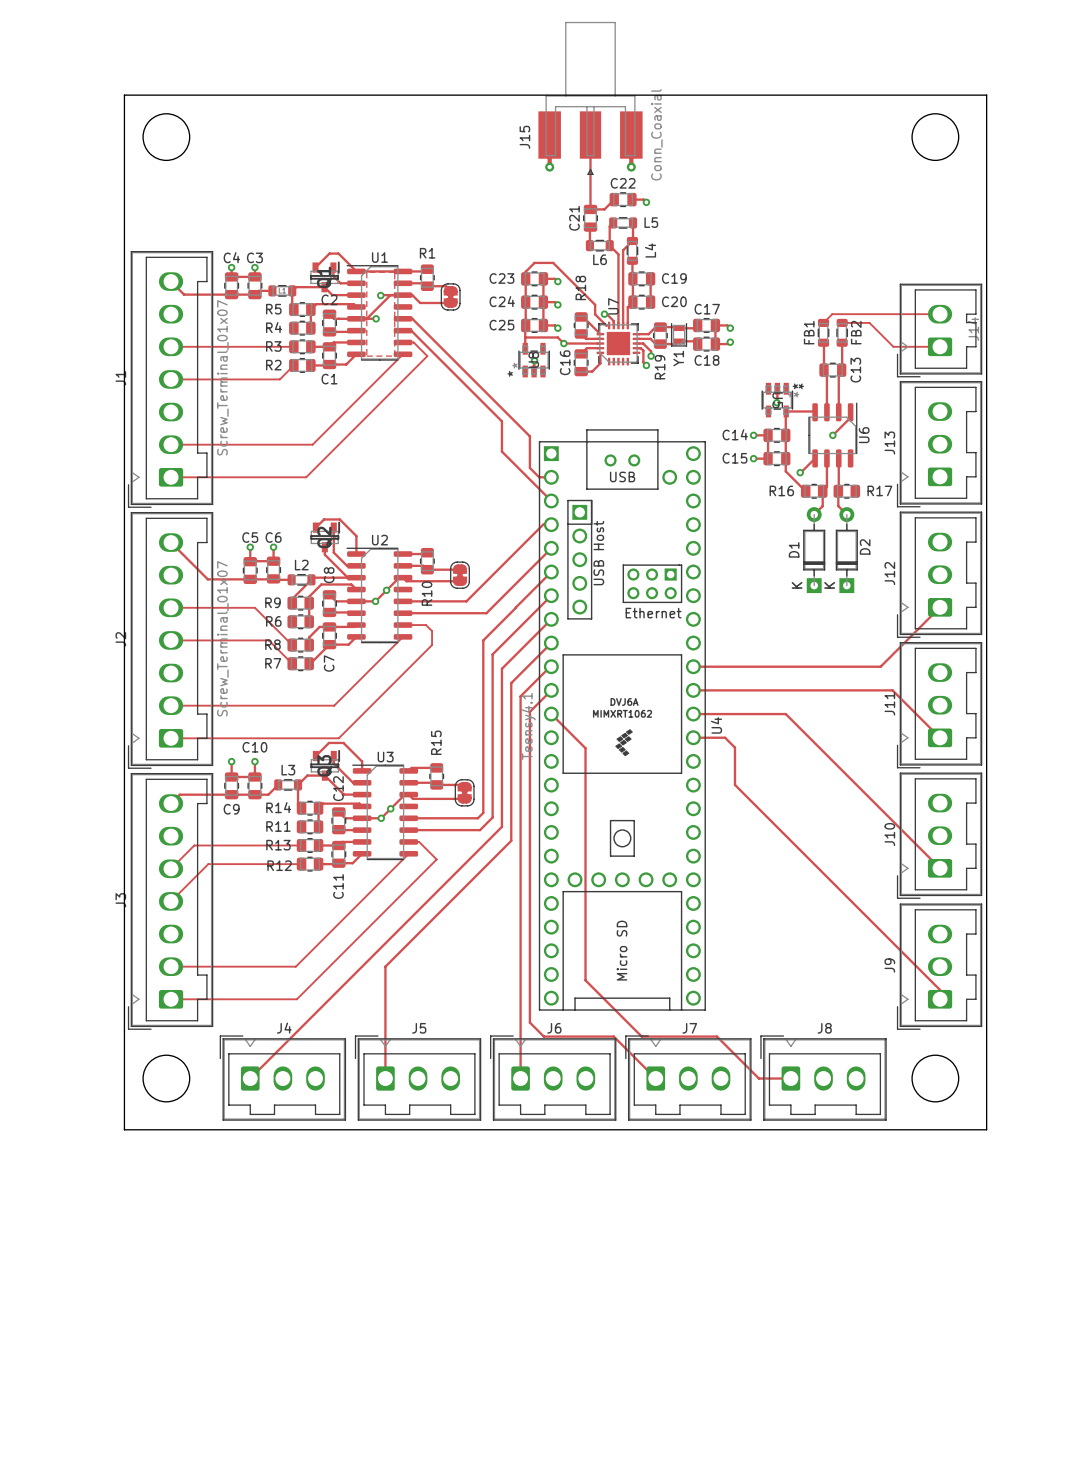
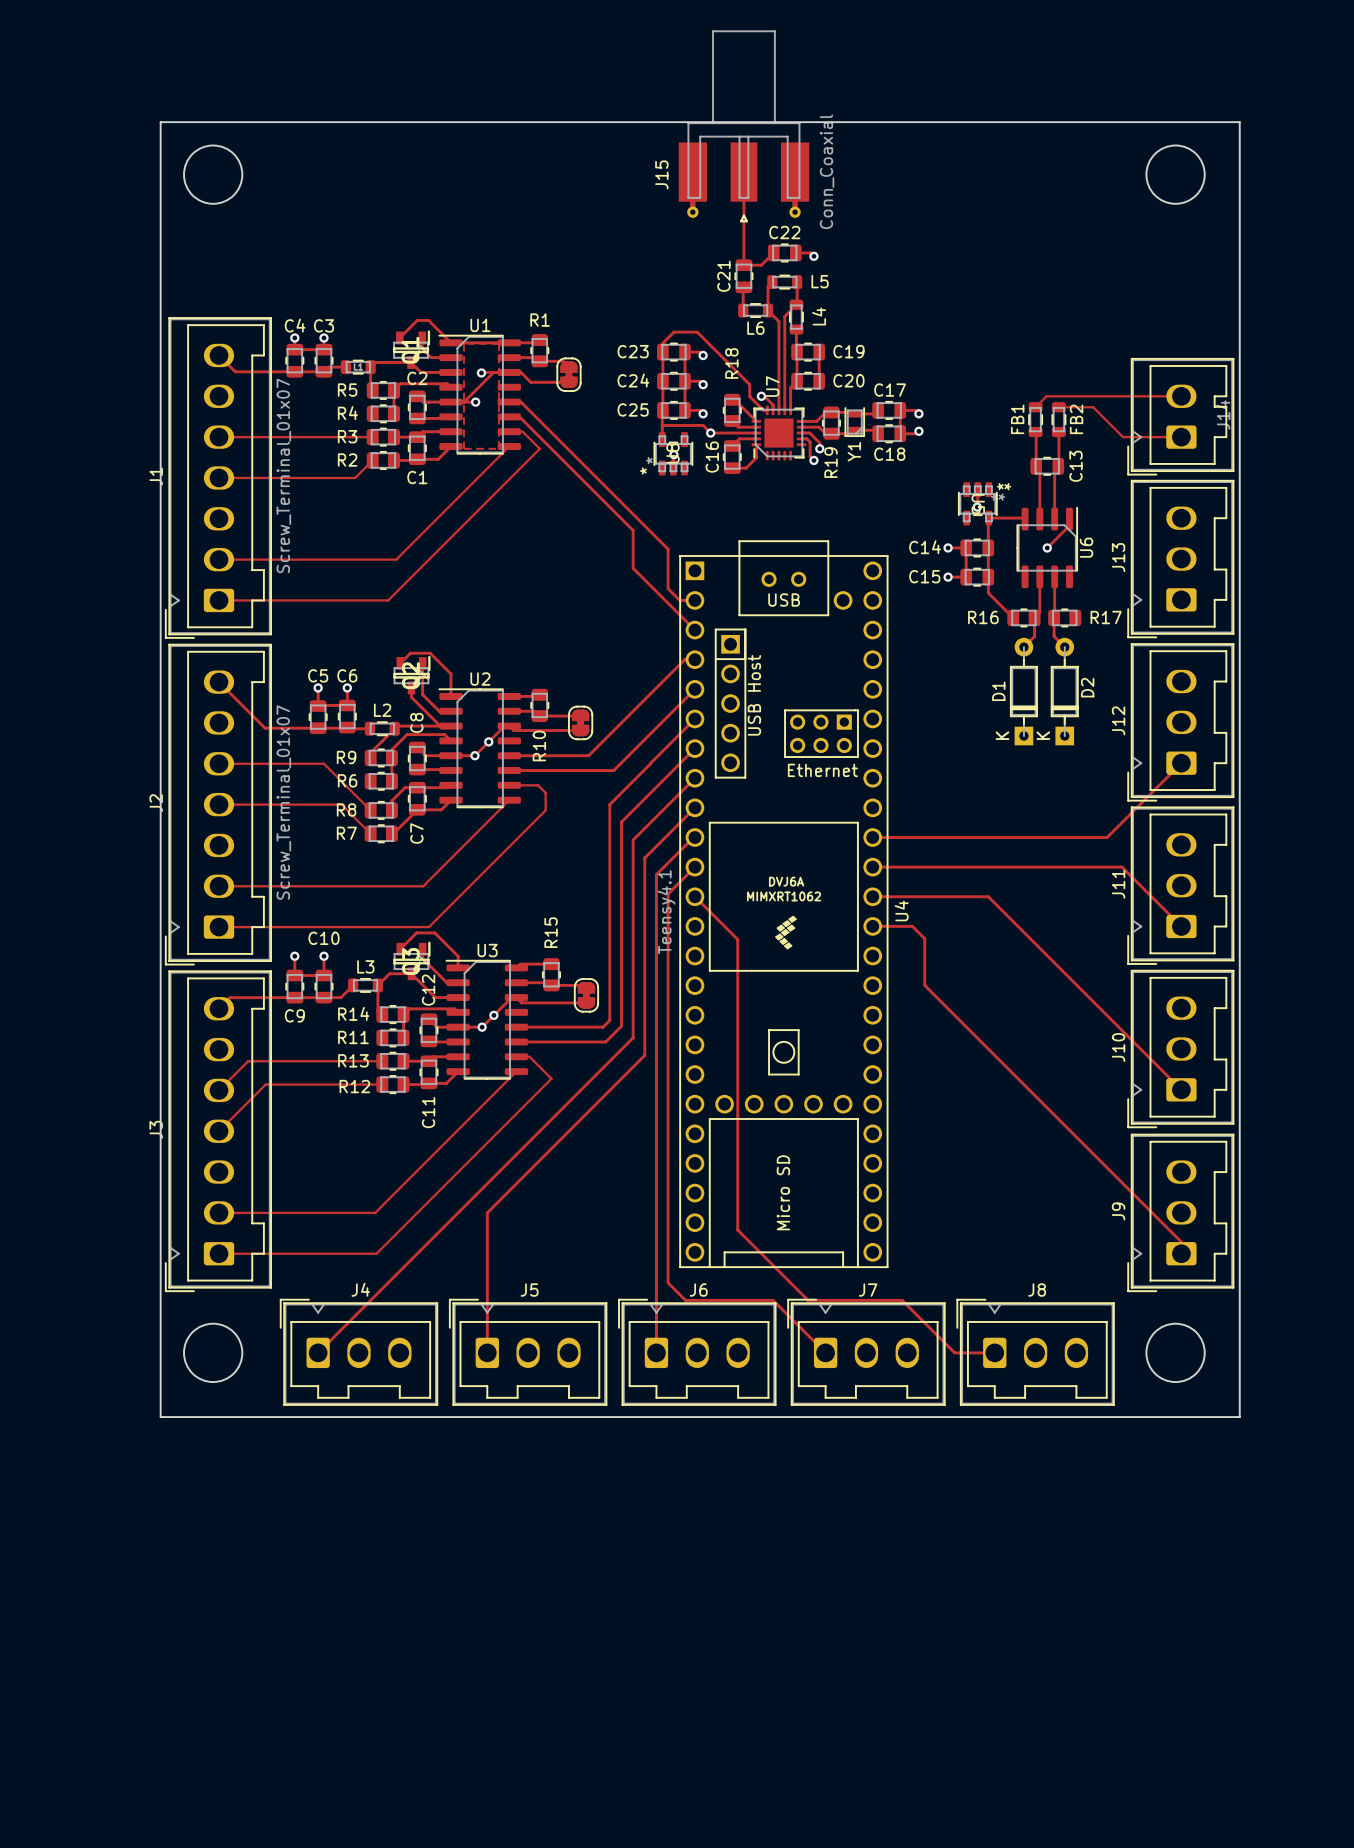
track: (815, 458) (800, 472) -> none
via: (800, 472) -> none

